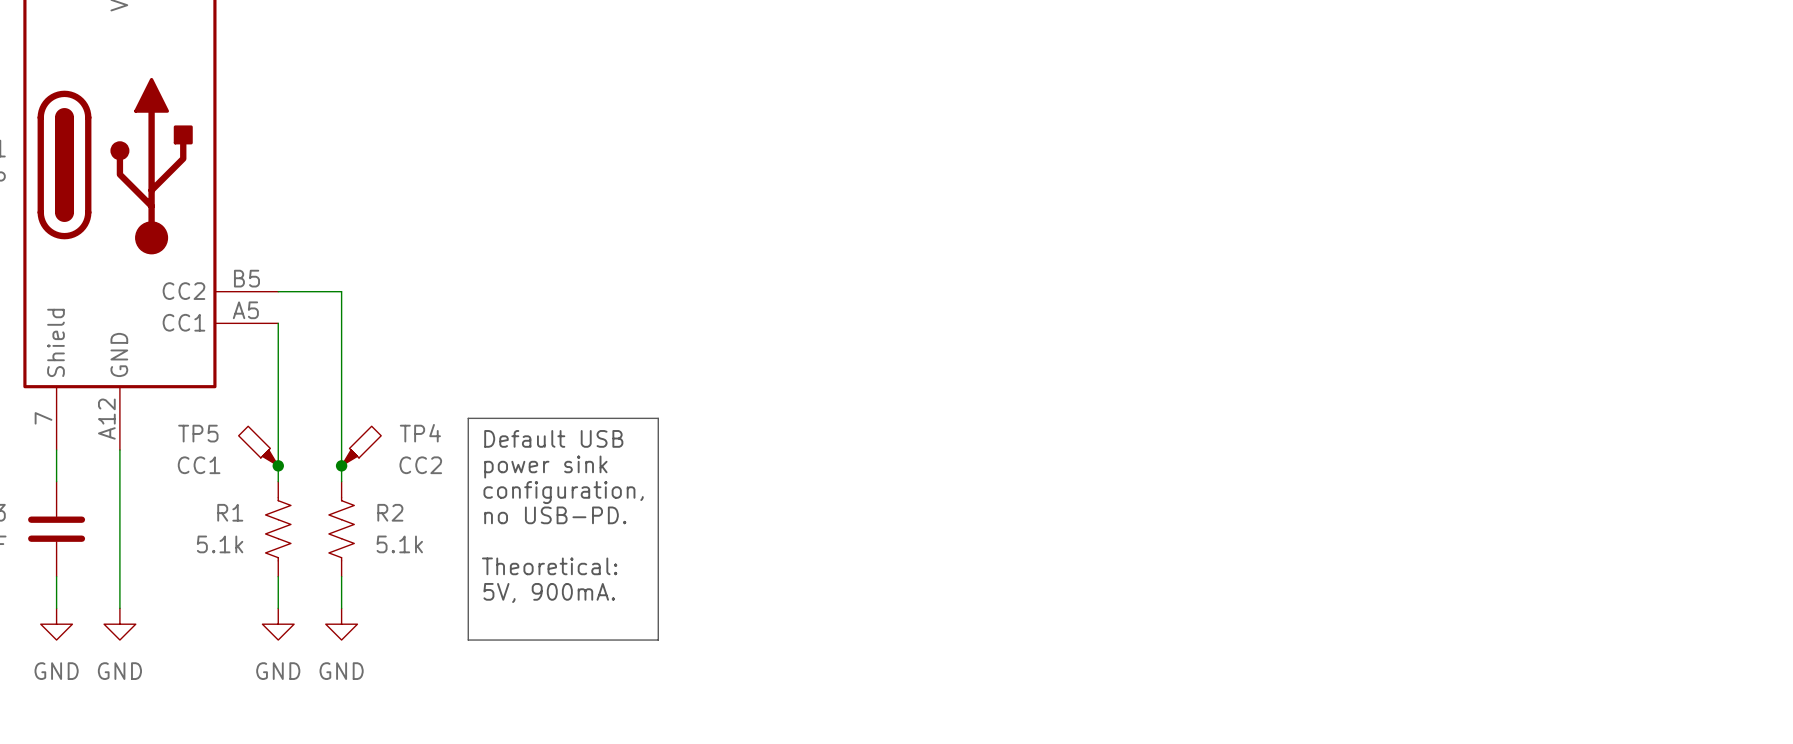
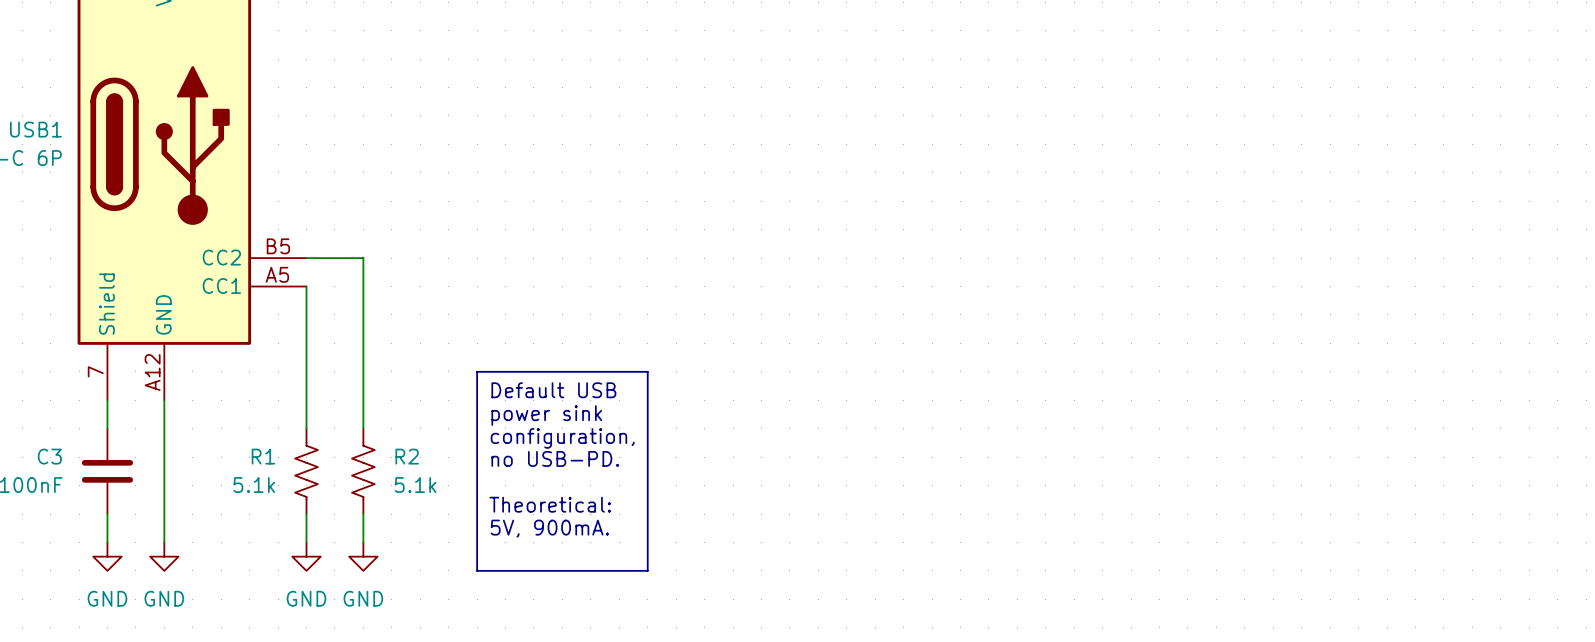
TP5: CC1 (258, 446) -> none
TP4: CC2 (361, 446) -> none
junction: (278, 465) -> none
junction: (341, 465) -> none

